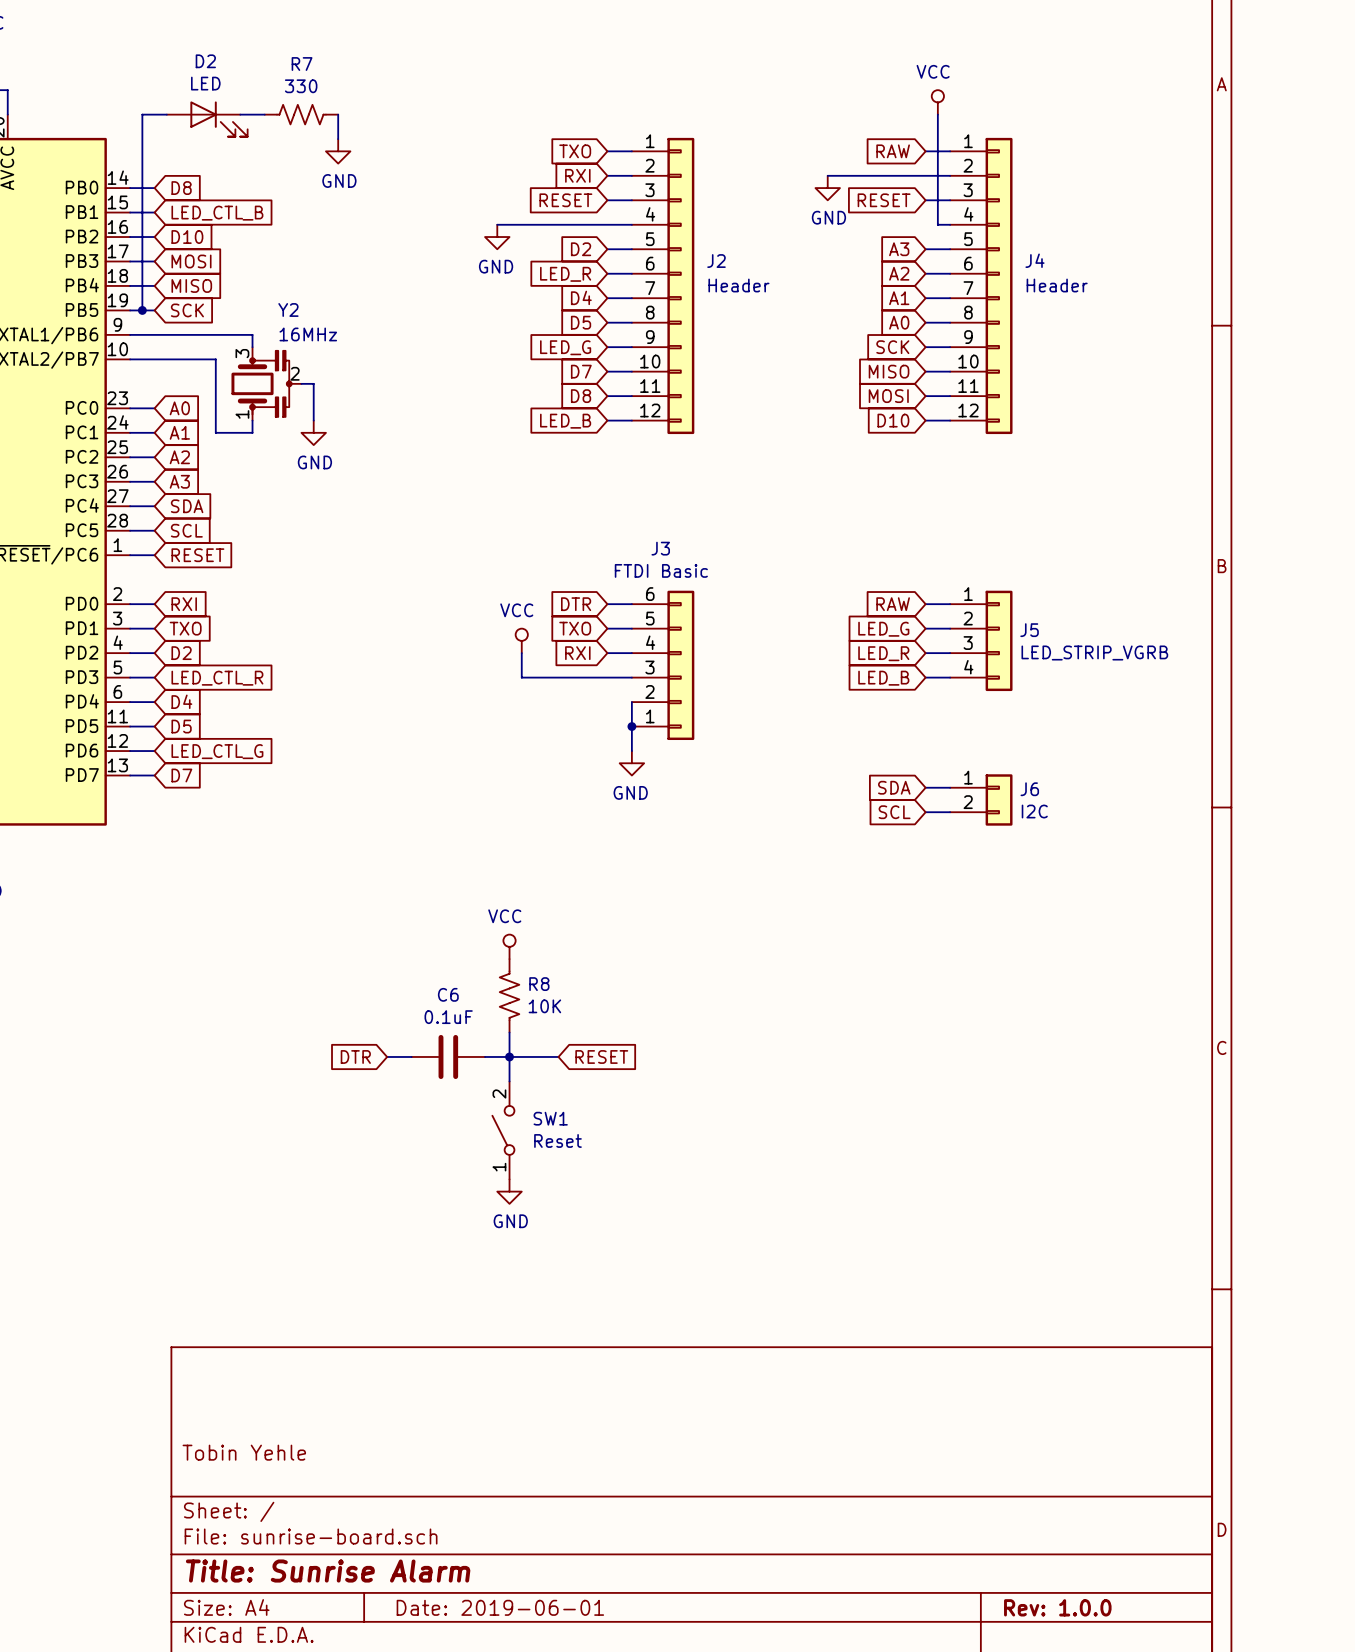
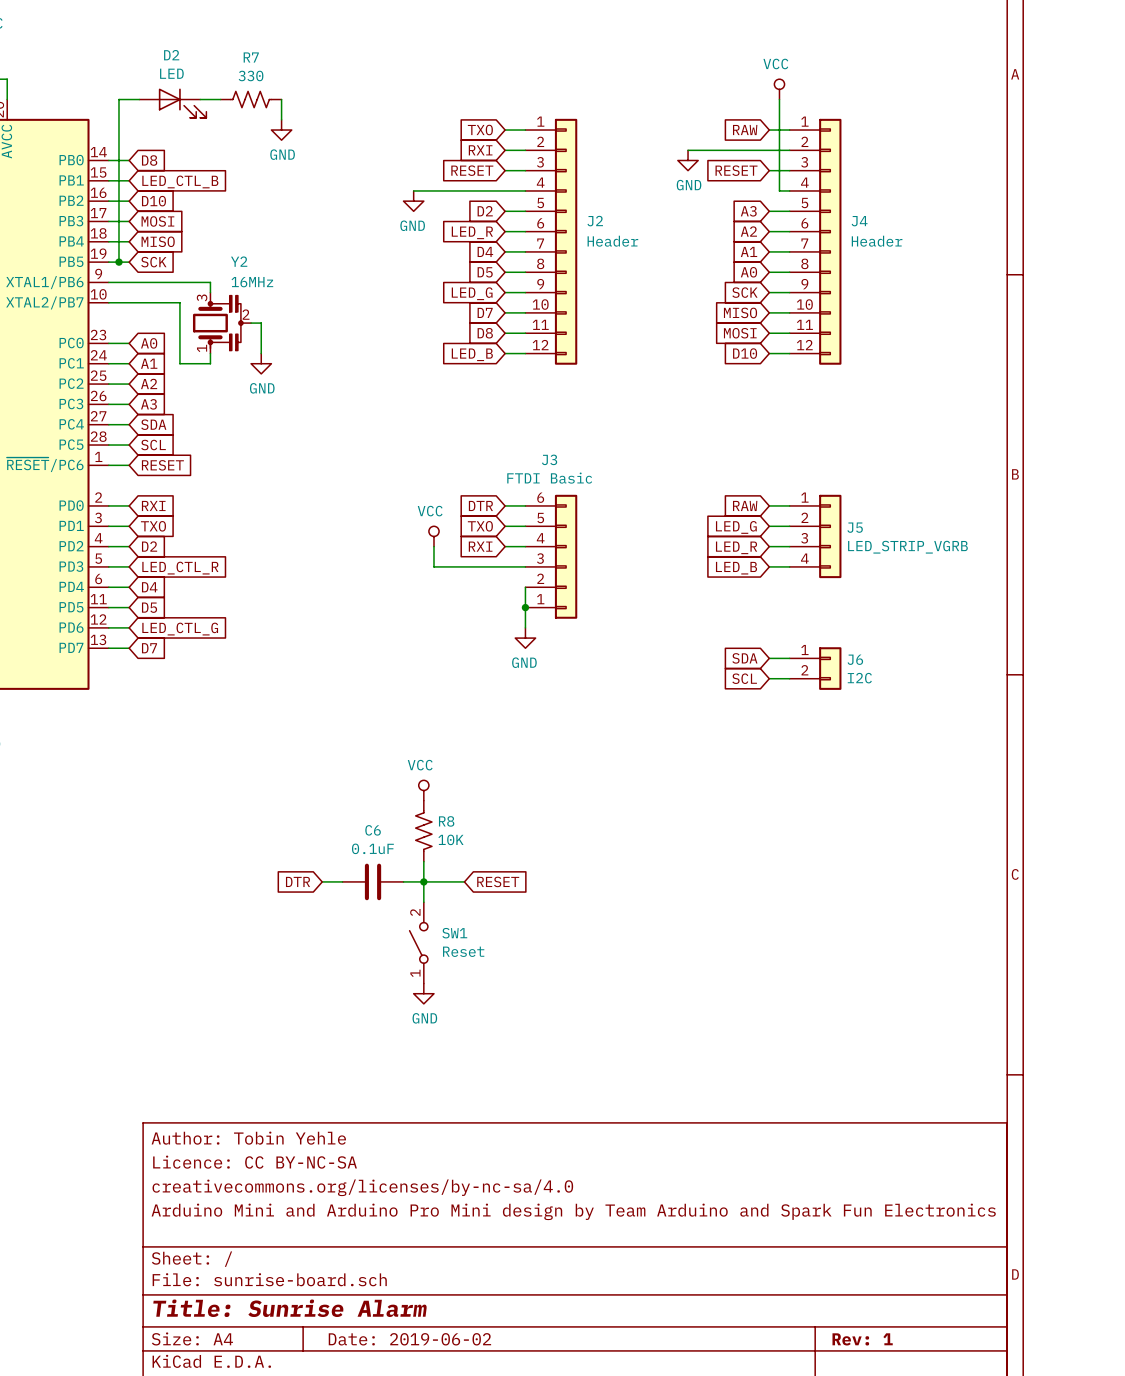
title block: none -> Author: Tobin Yehle (248, 1138)
title block: none -> Licence: CC BY-NC-SA (255, 1162)
title block: none -> creativecommons.org/licenses/by-nc-sa/4.0 (362, 1187)
title block: Tobin Yehle (244, 1452) -> Arduino Mini and Arduino Pro Mini design by Team Arduino and Spark Fun Electronics (573, 1211)
title block: Date: 2019-06-01 (500, 1607) -> Date: 2019-06-02 (409, 1339)
title block: Rev: 1.0.0 (1057, 1607) -> Rev: 1 (862, 1339)

